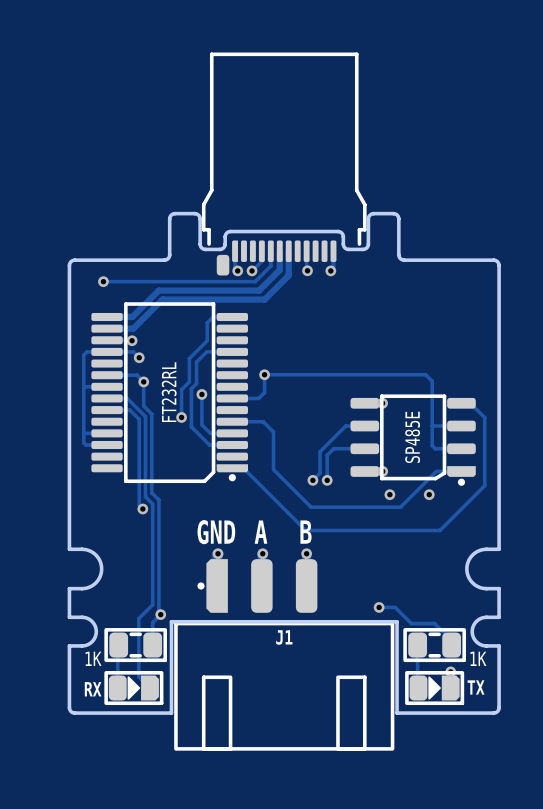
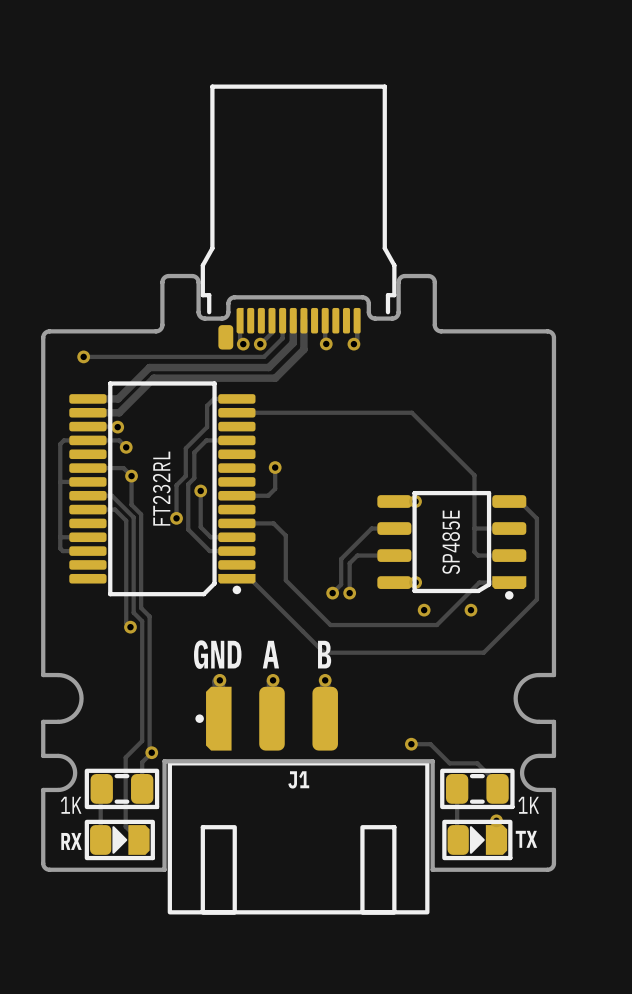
track: (264, 374) (425, 374) -> (236, 412) (411, 412) (466, 467)

